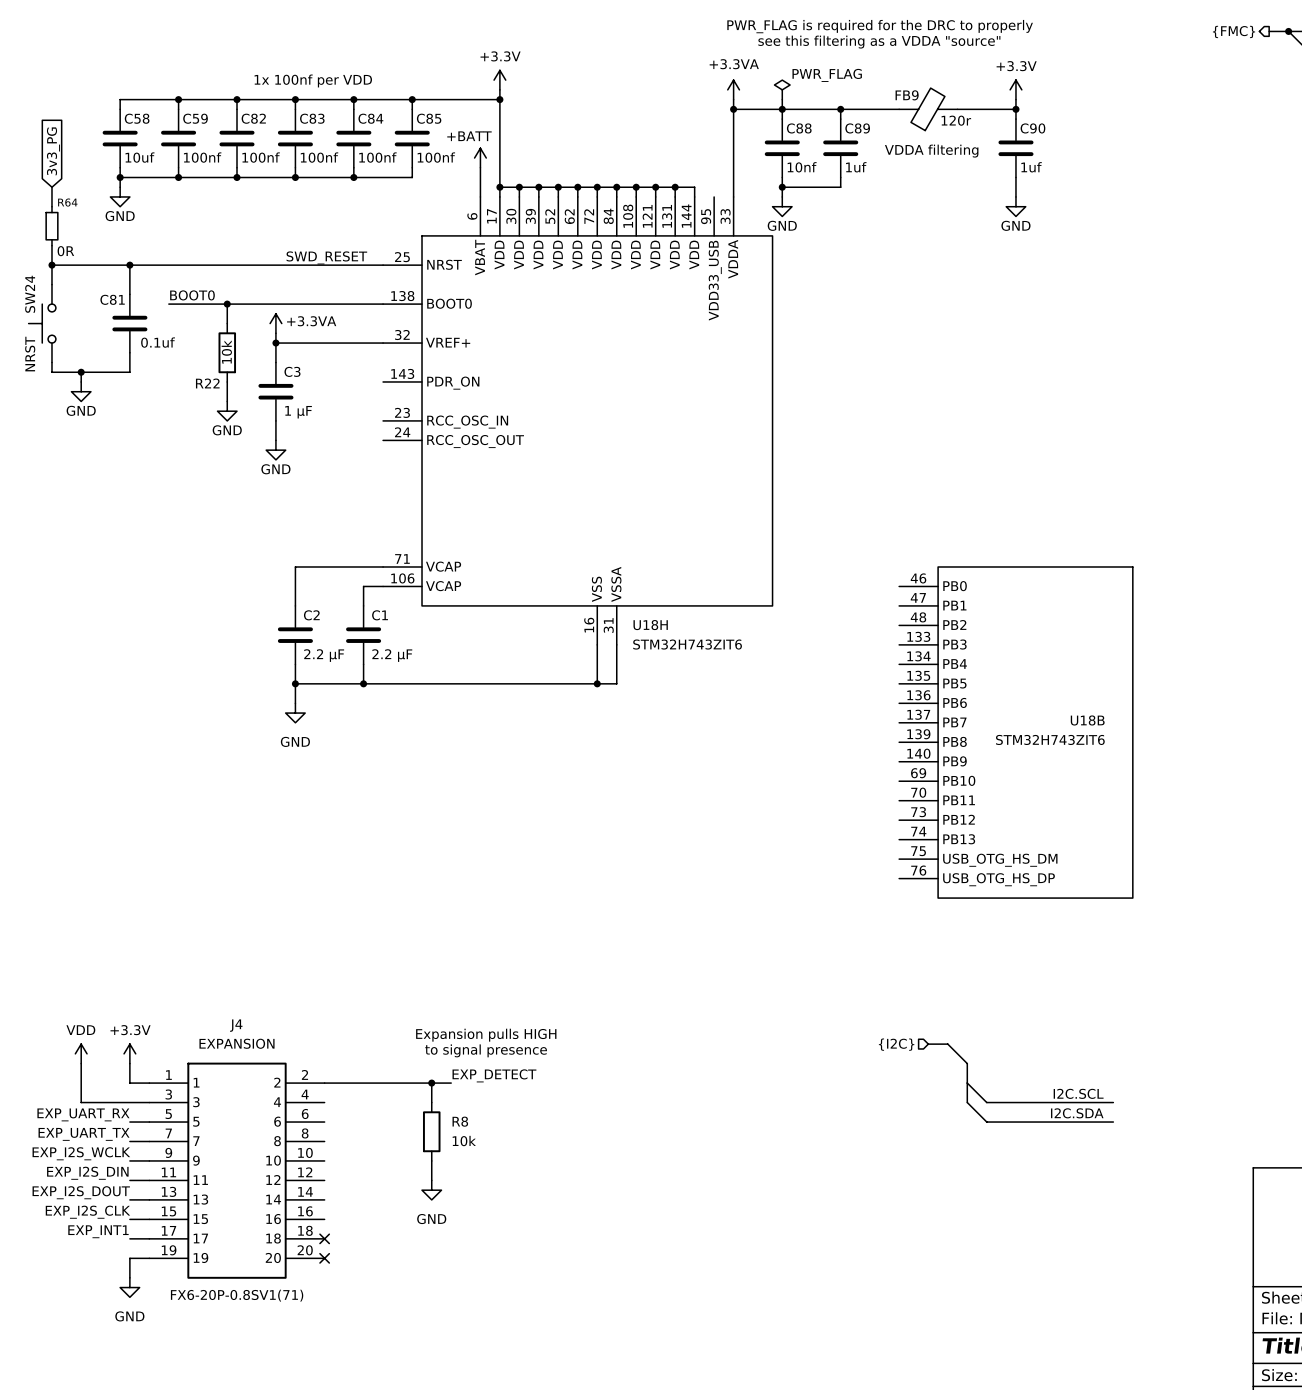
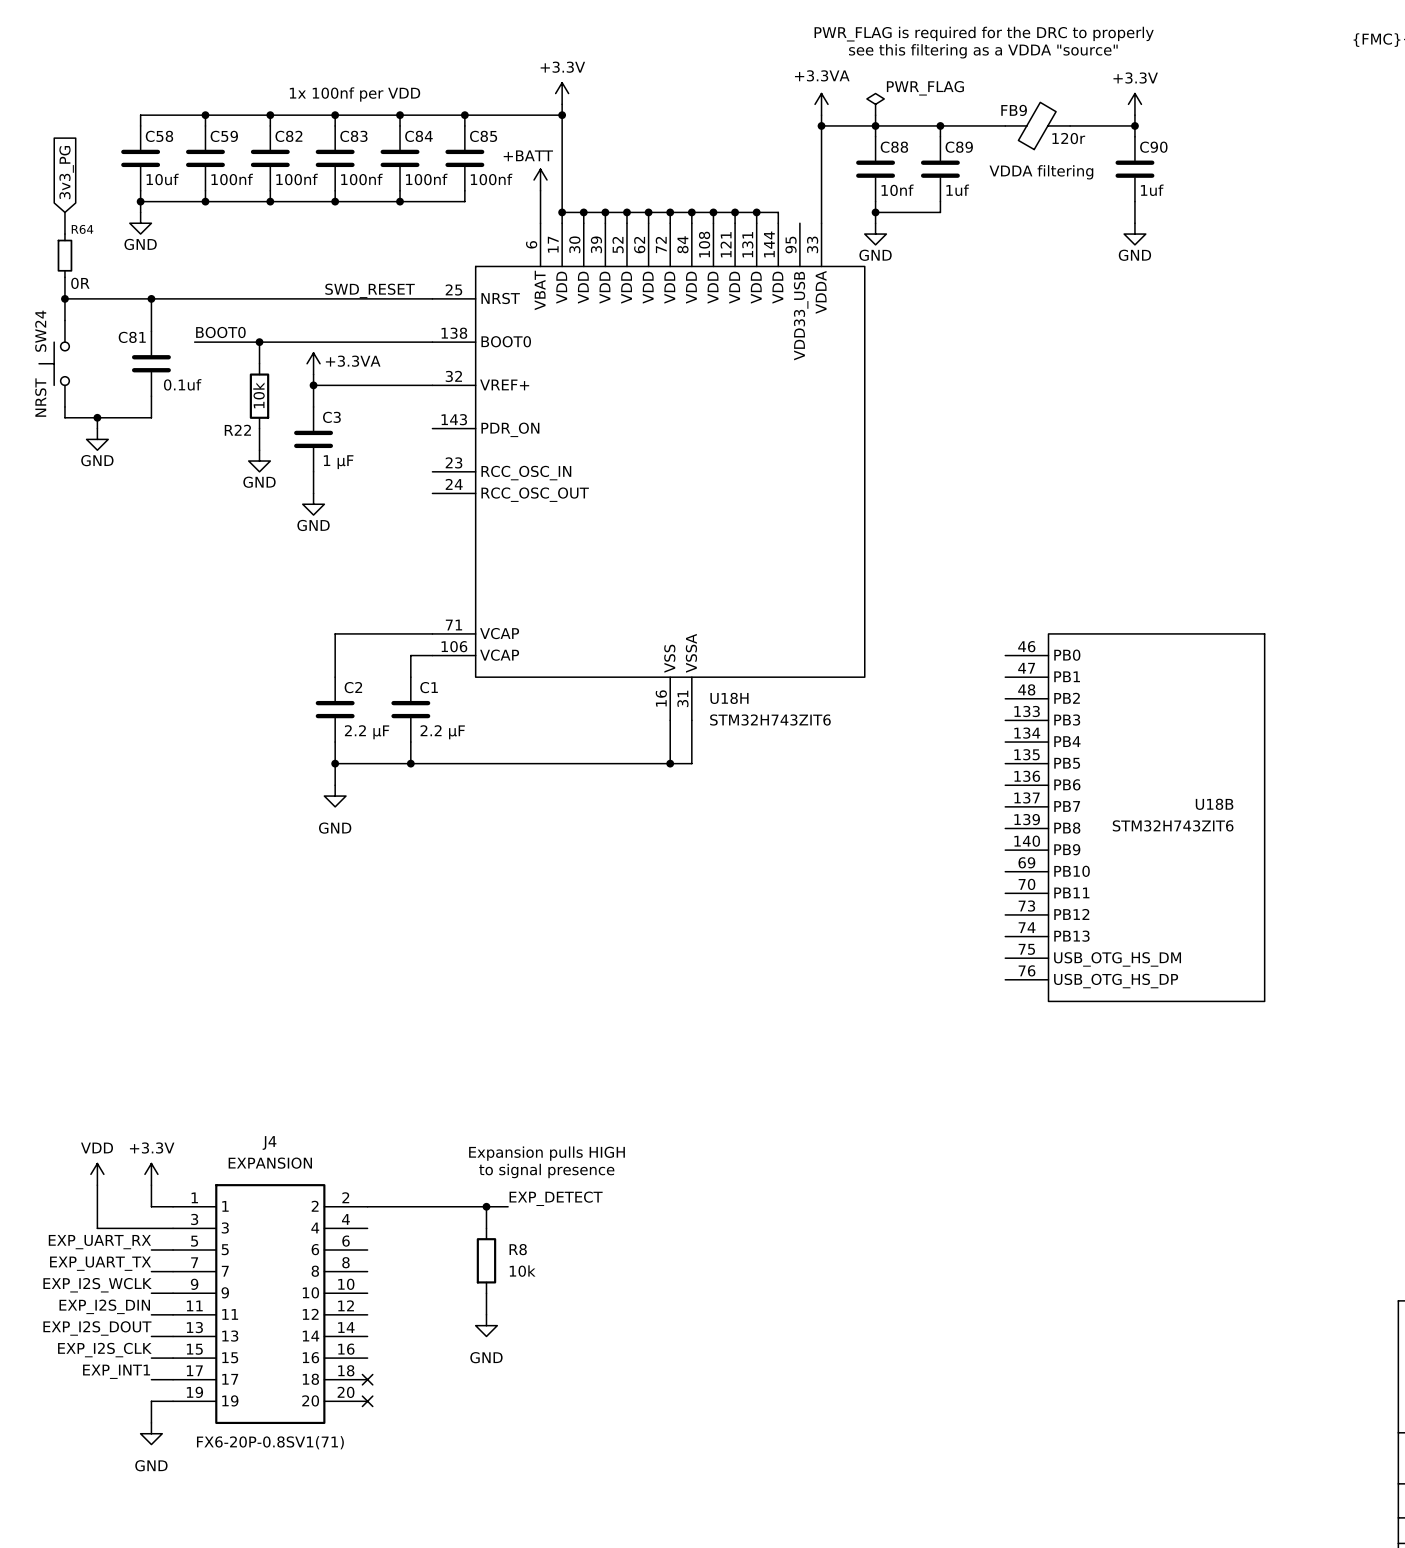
hierarchical label: {I2C} (896, 1044) -> none
bus: (928, 1044) (947, 1044) (967, 1063) (967, 1102) -> none
wire: (967, 1083) (986, 1102) (1113, 1102) -> none
label: I2C.SCL (1078, 1093) -> none
wire: (967, 1102) (986, 1122) (1113, 1122) -> none
label: I2C.SDA (1077, 1113) -> none

